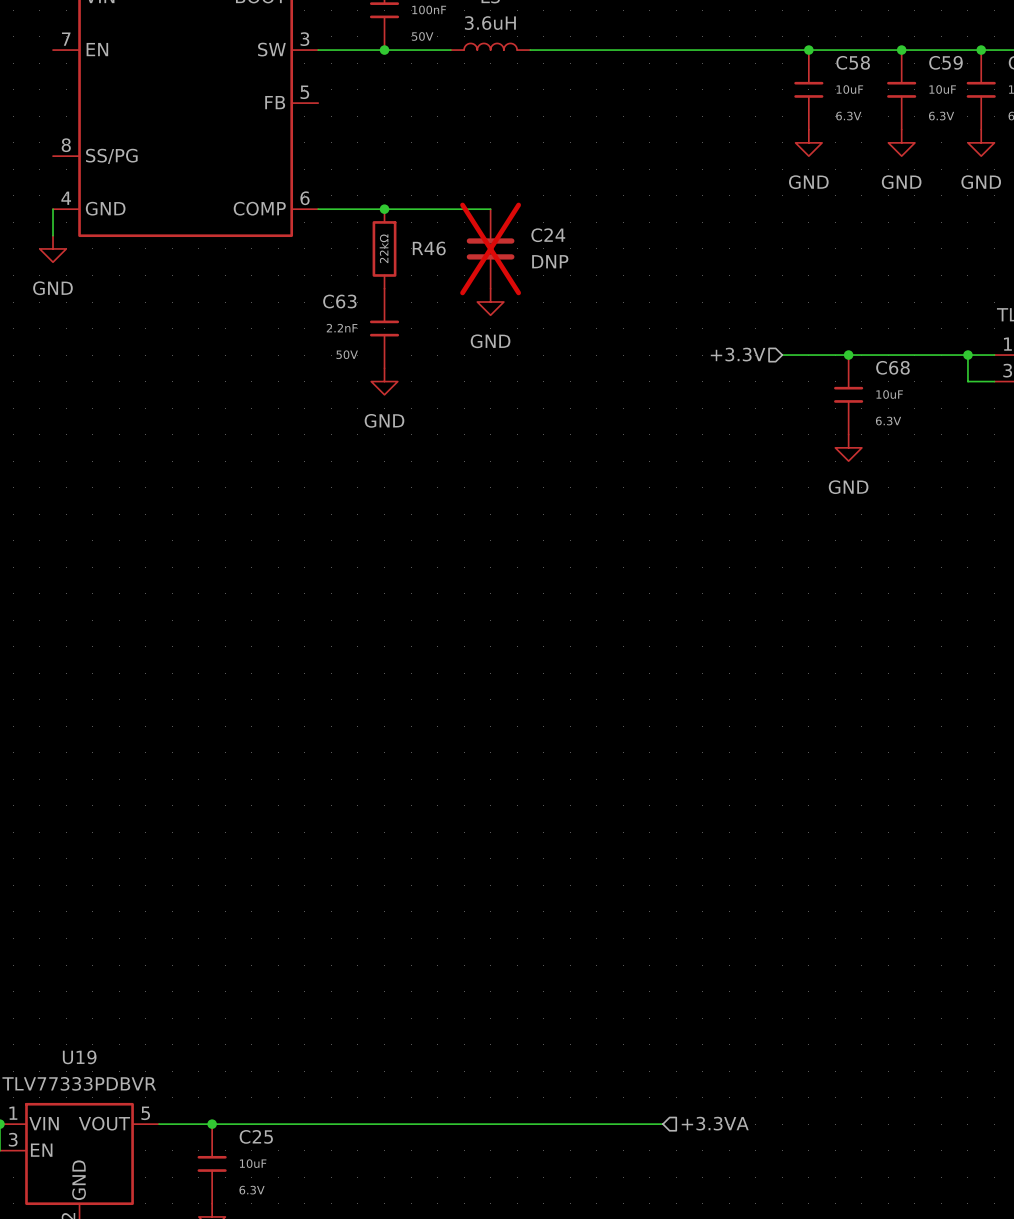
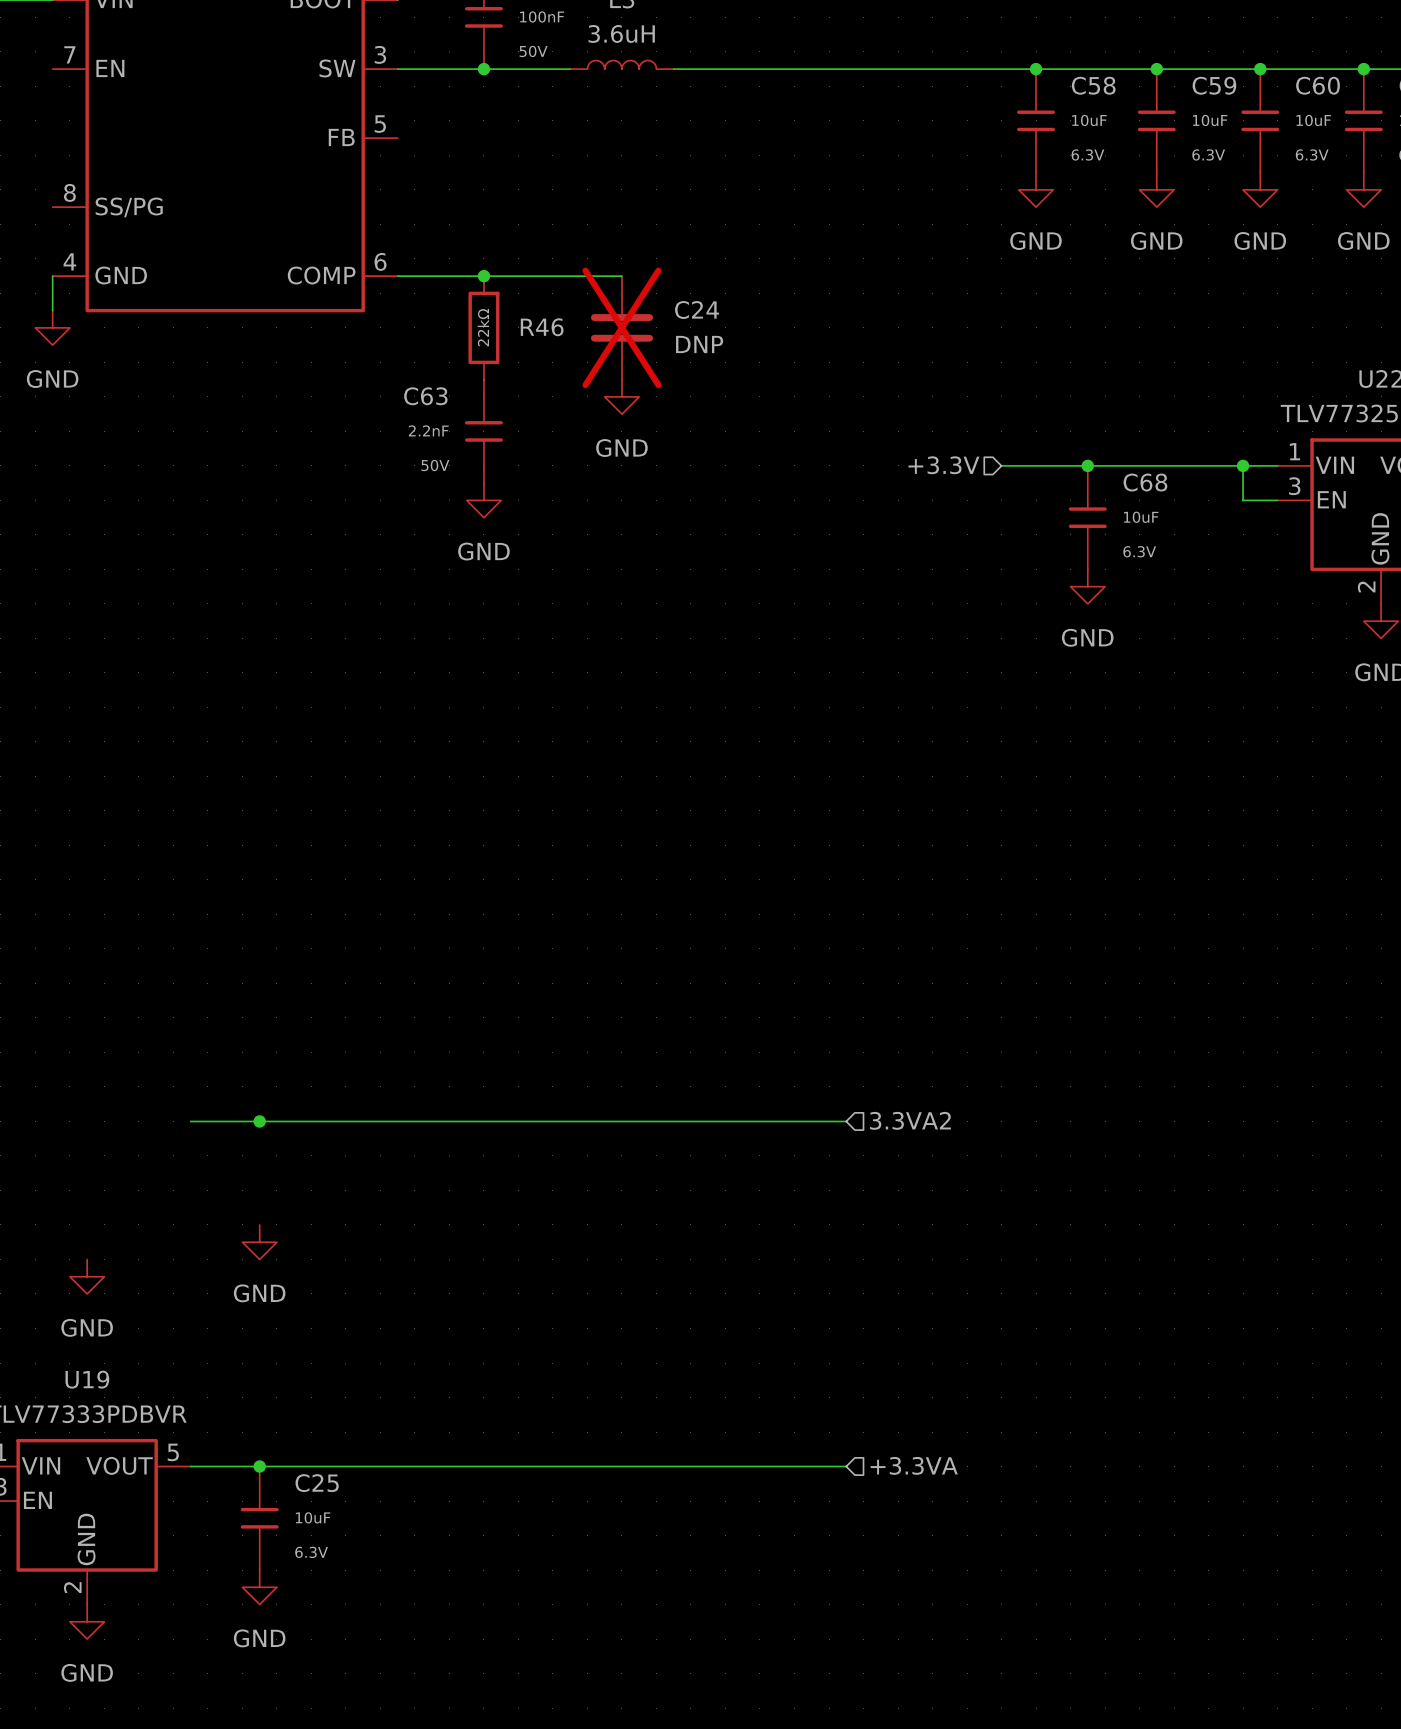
wire: none -> (190, 1121) (846, 1121)
junction: none -> (259, 1121)
hierarchical label: none -> 3.3VA2 (910, 1120)
power symbol: none -> GND (259, 1242)
power symbol: none -> GND (87, 1276)

